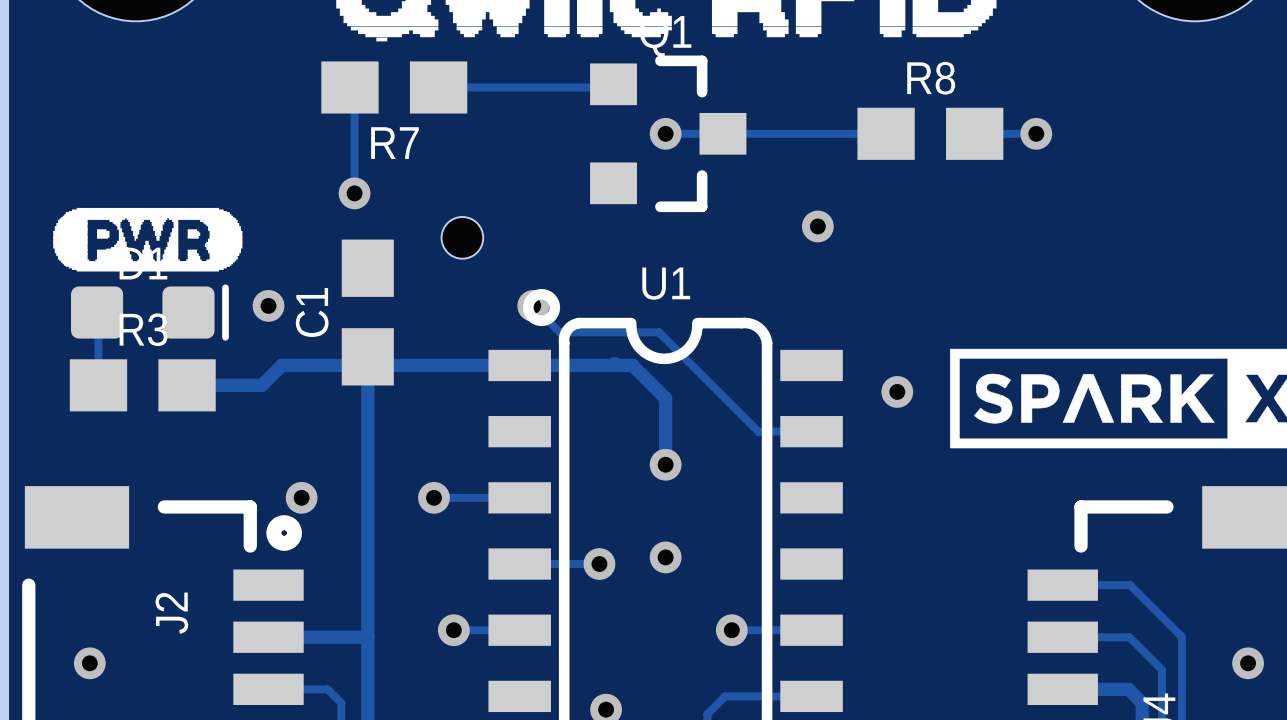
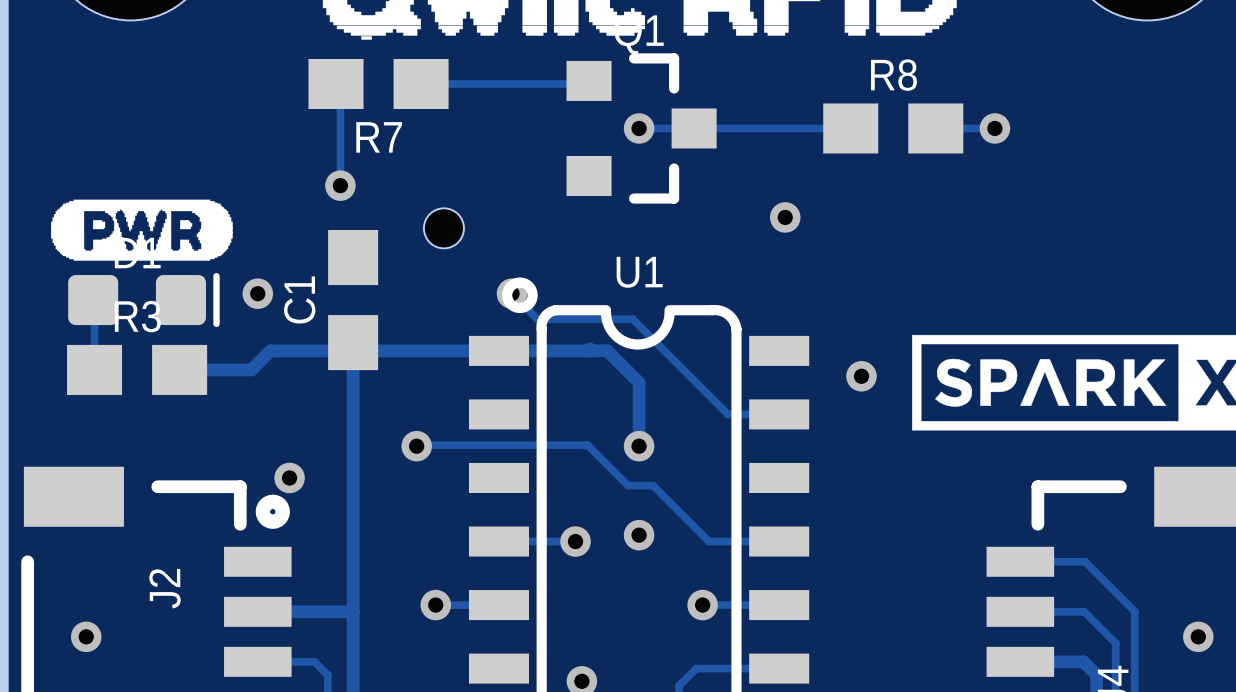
track: none -> (416, 446) (587, 445) (628, 485) (653, 485) (708, 541) (779, 541)
track: (433, 497) (519, 497) -> none
via position: (433, 497) -> (416, 446)

